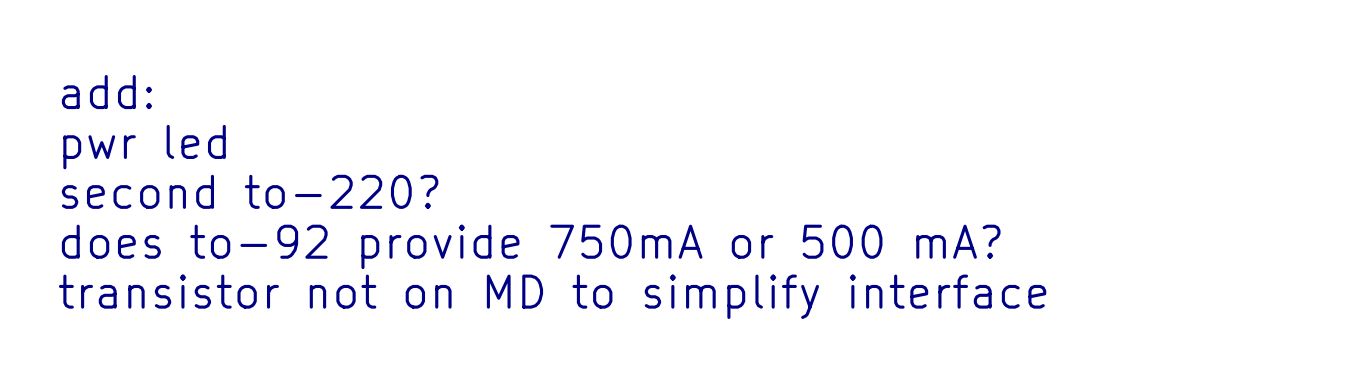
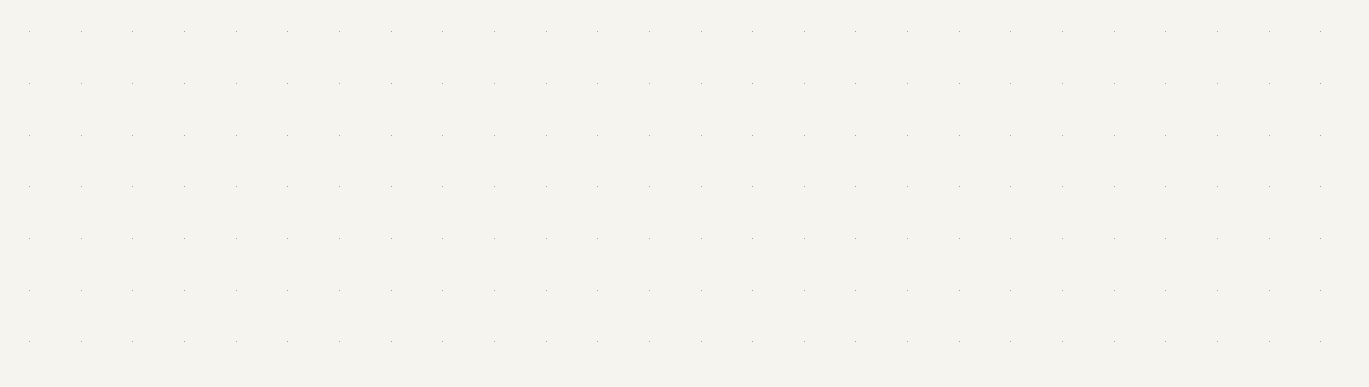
text: add: (106, 92) -> none
text: pwr led (144, 147) -> none
text: second to-220? (250, 191) -> none
text: does to-92 provide 750mA or 500 mA? (531, 246) -> none
text: transistor not on MD to simplify interface (552, 296) -> none

